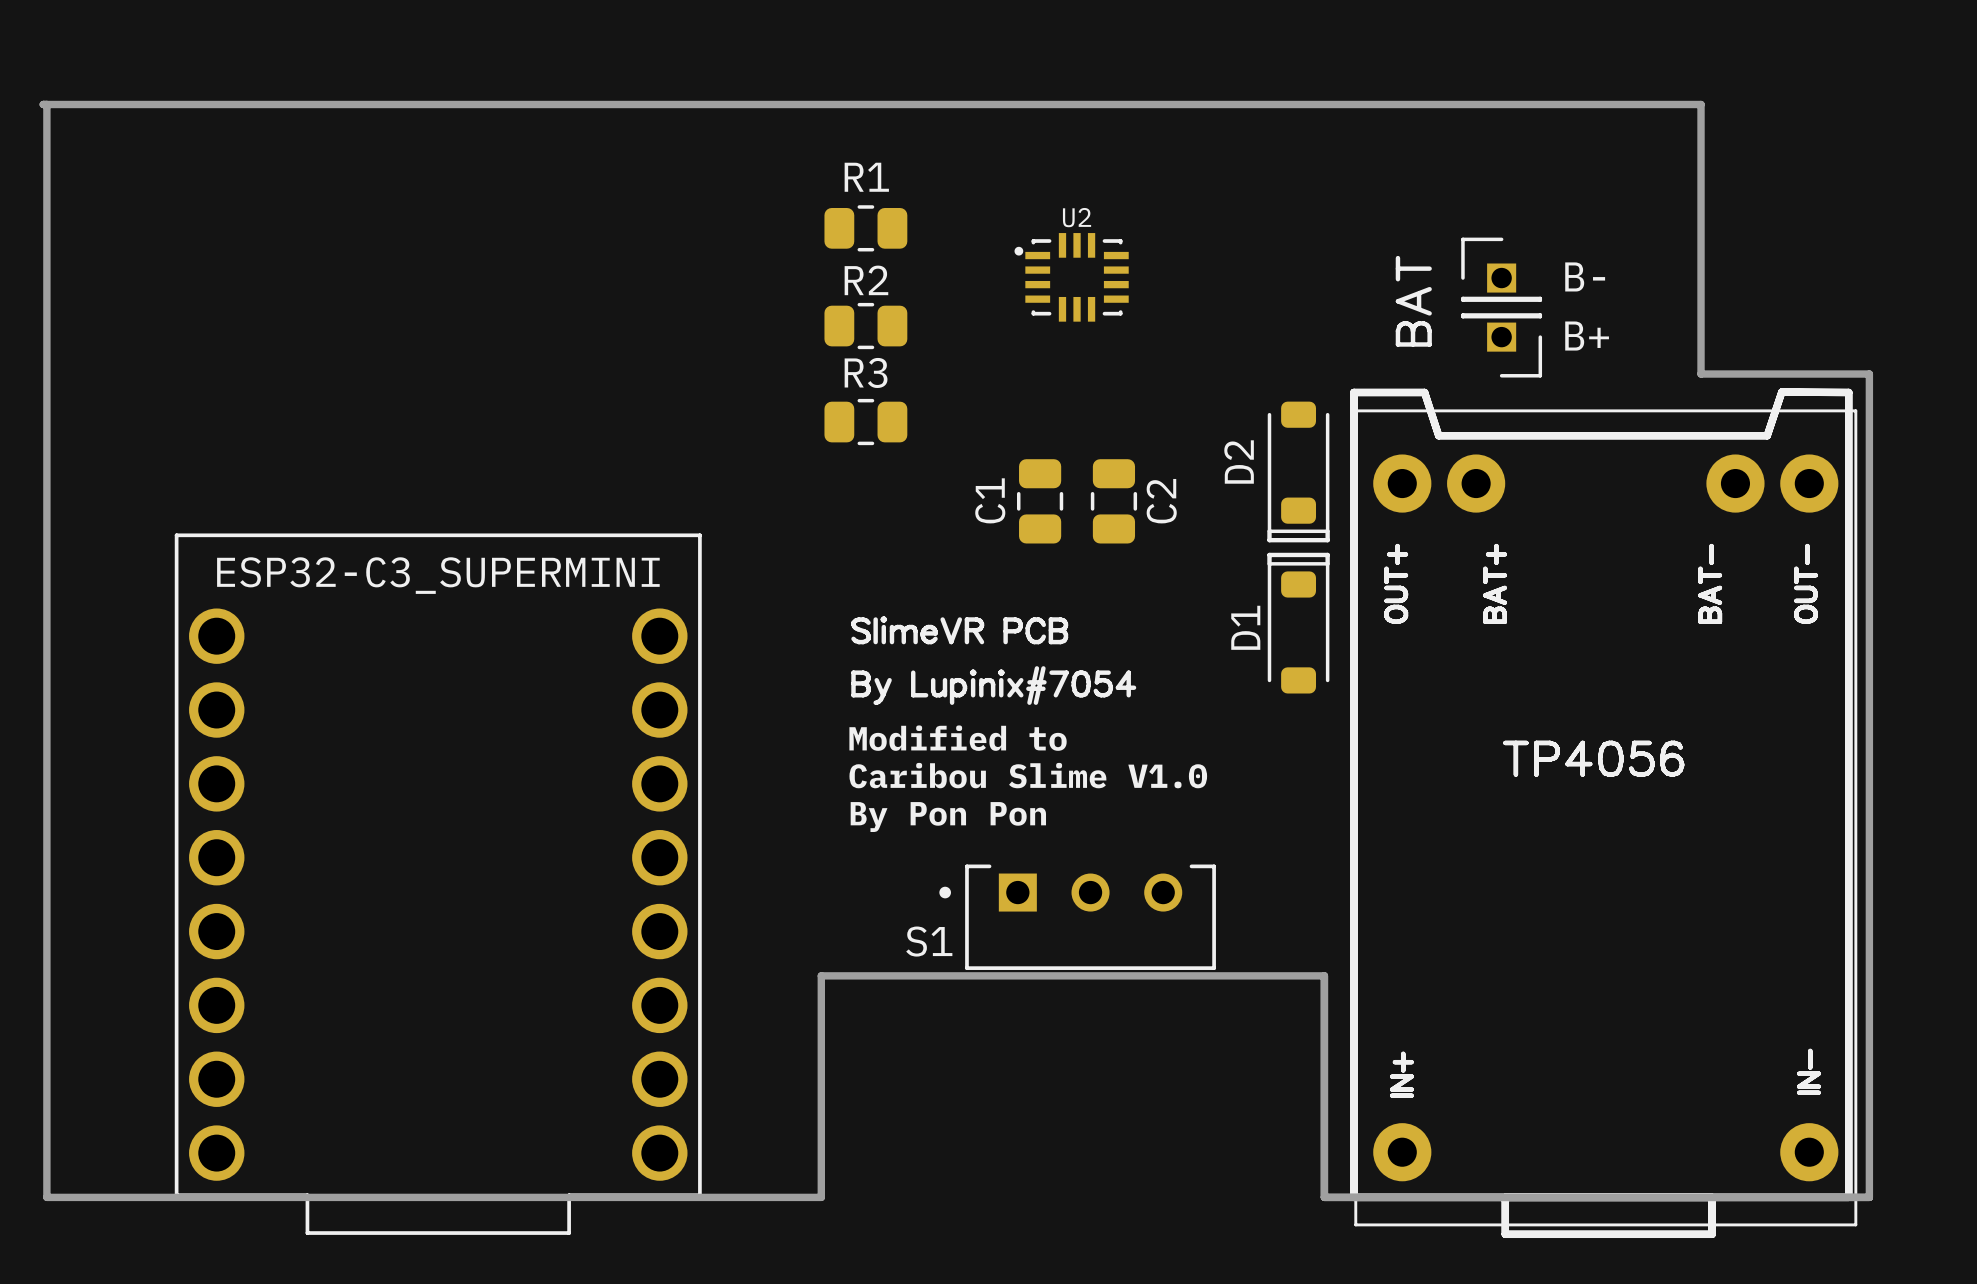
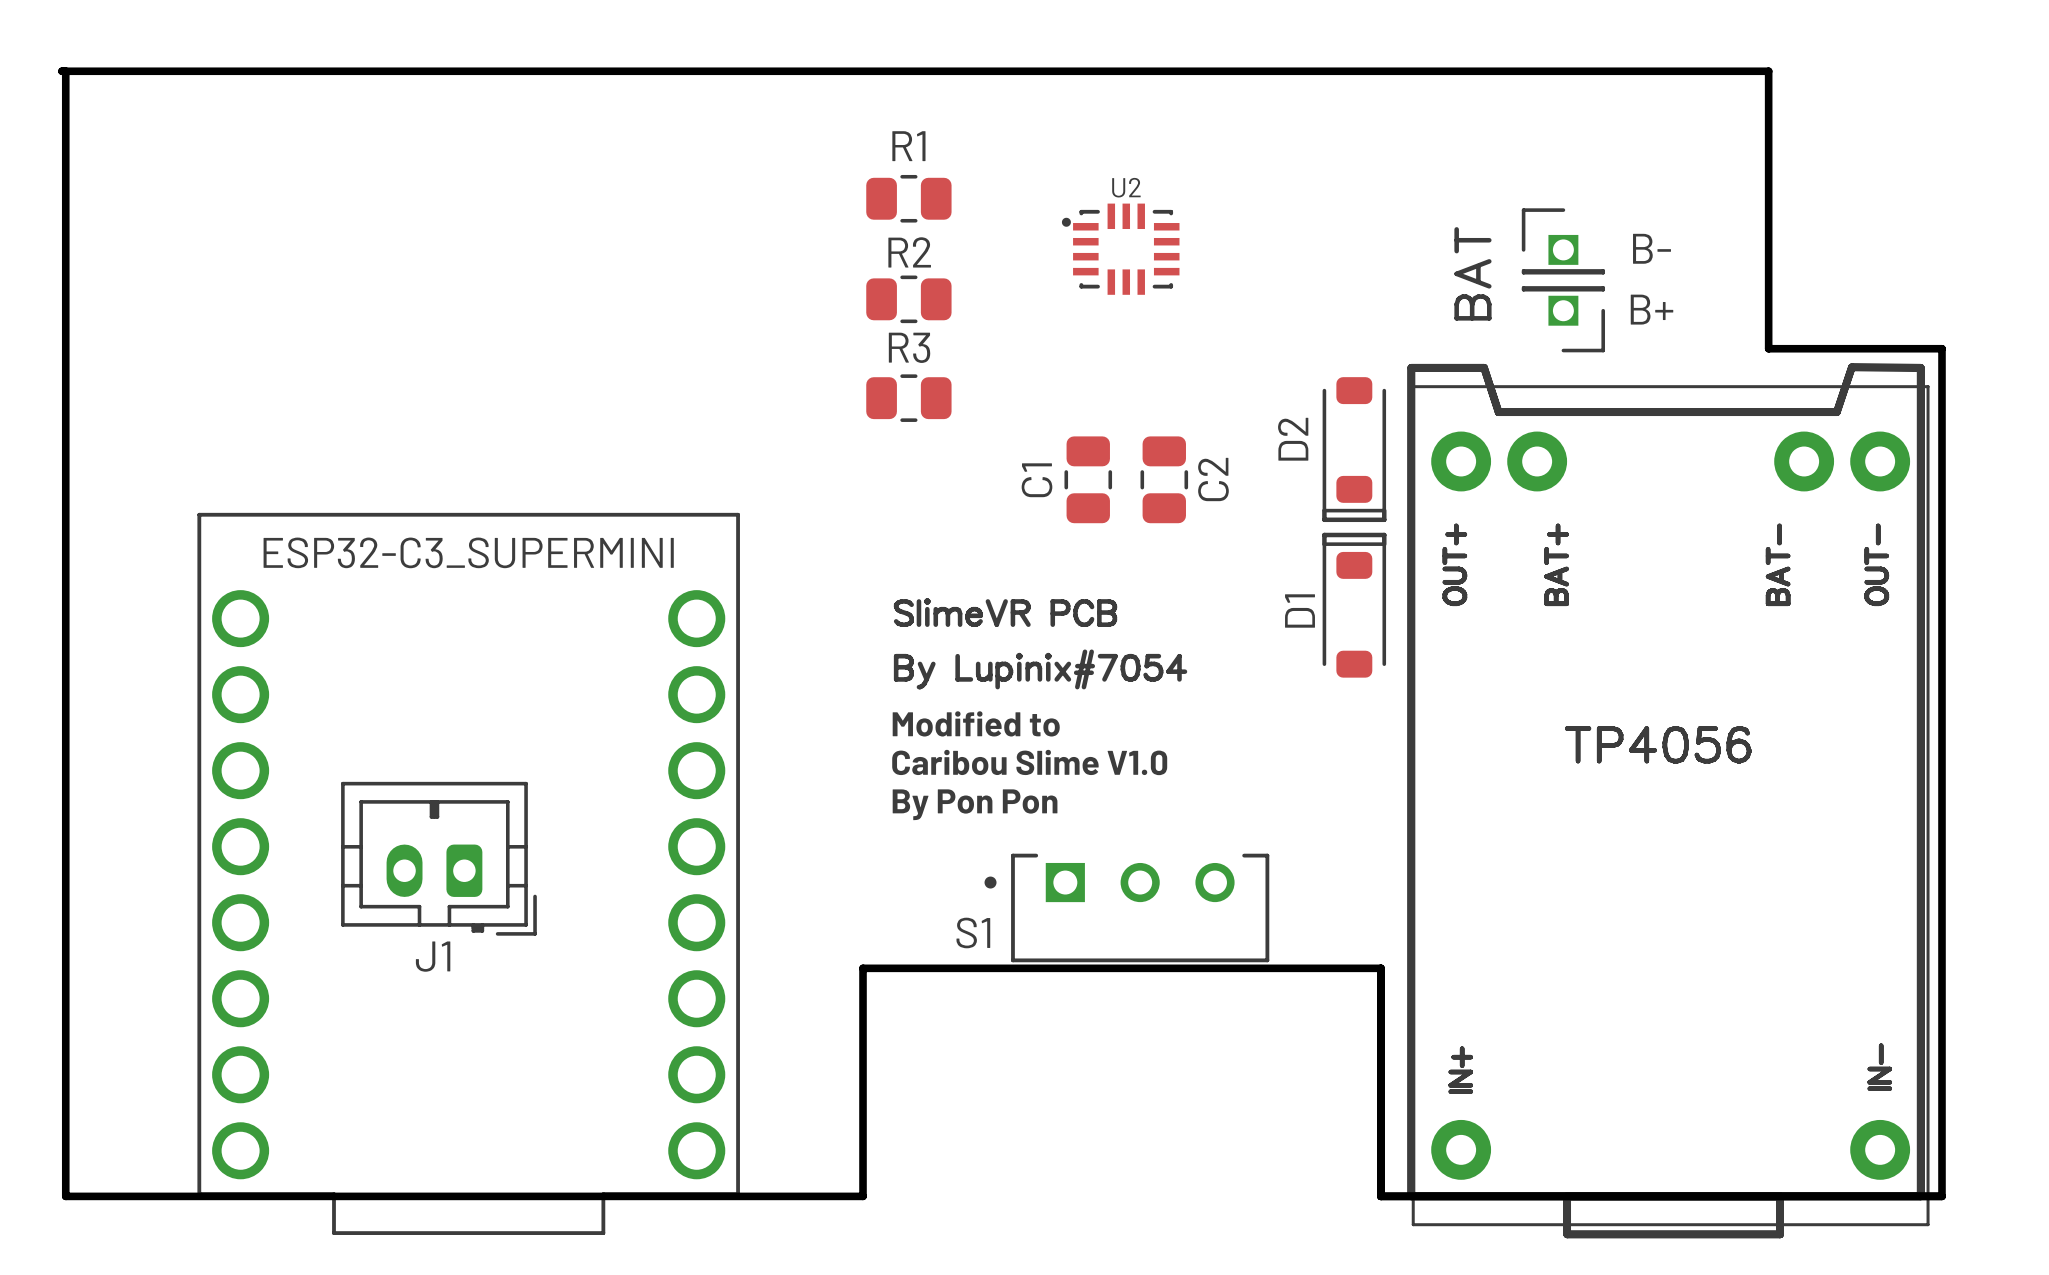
J1: none -> (438, 858)

